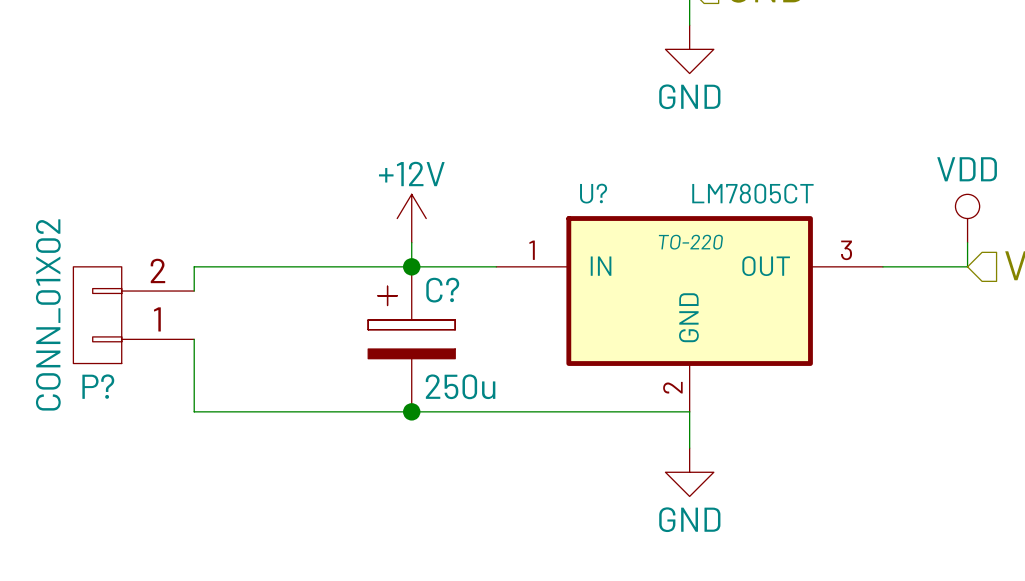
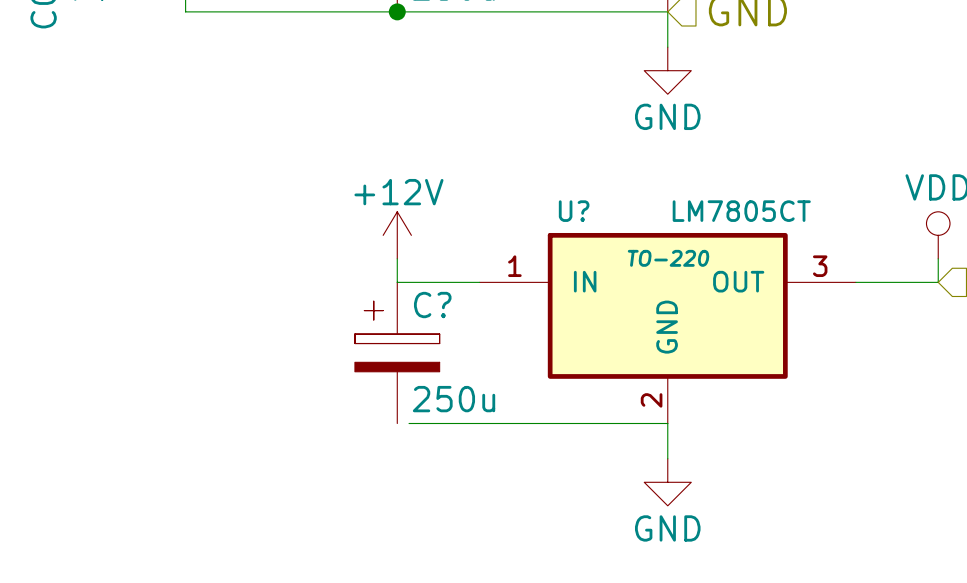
wire: (411, 266) (194, 266) (194, 291) -> none
junction: (411, 266) -> none
P?: CONN_01X02 (133, 315) -> none
wire: (194, 339) (194, 411) (423, 411) -> none
junction: (411, 411) -> none

